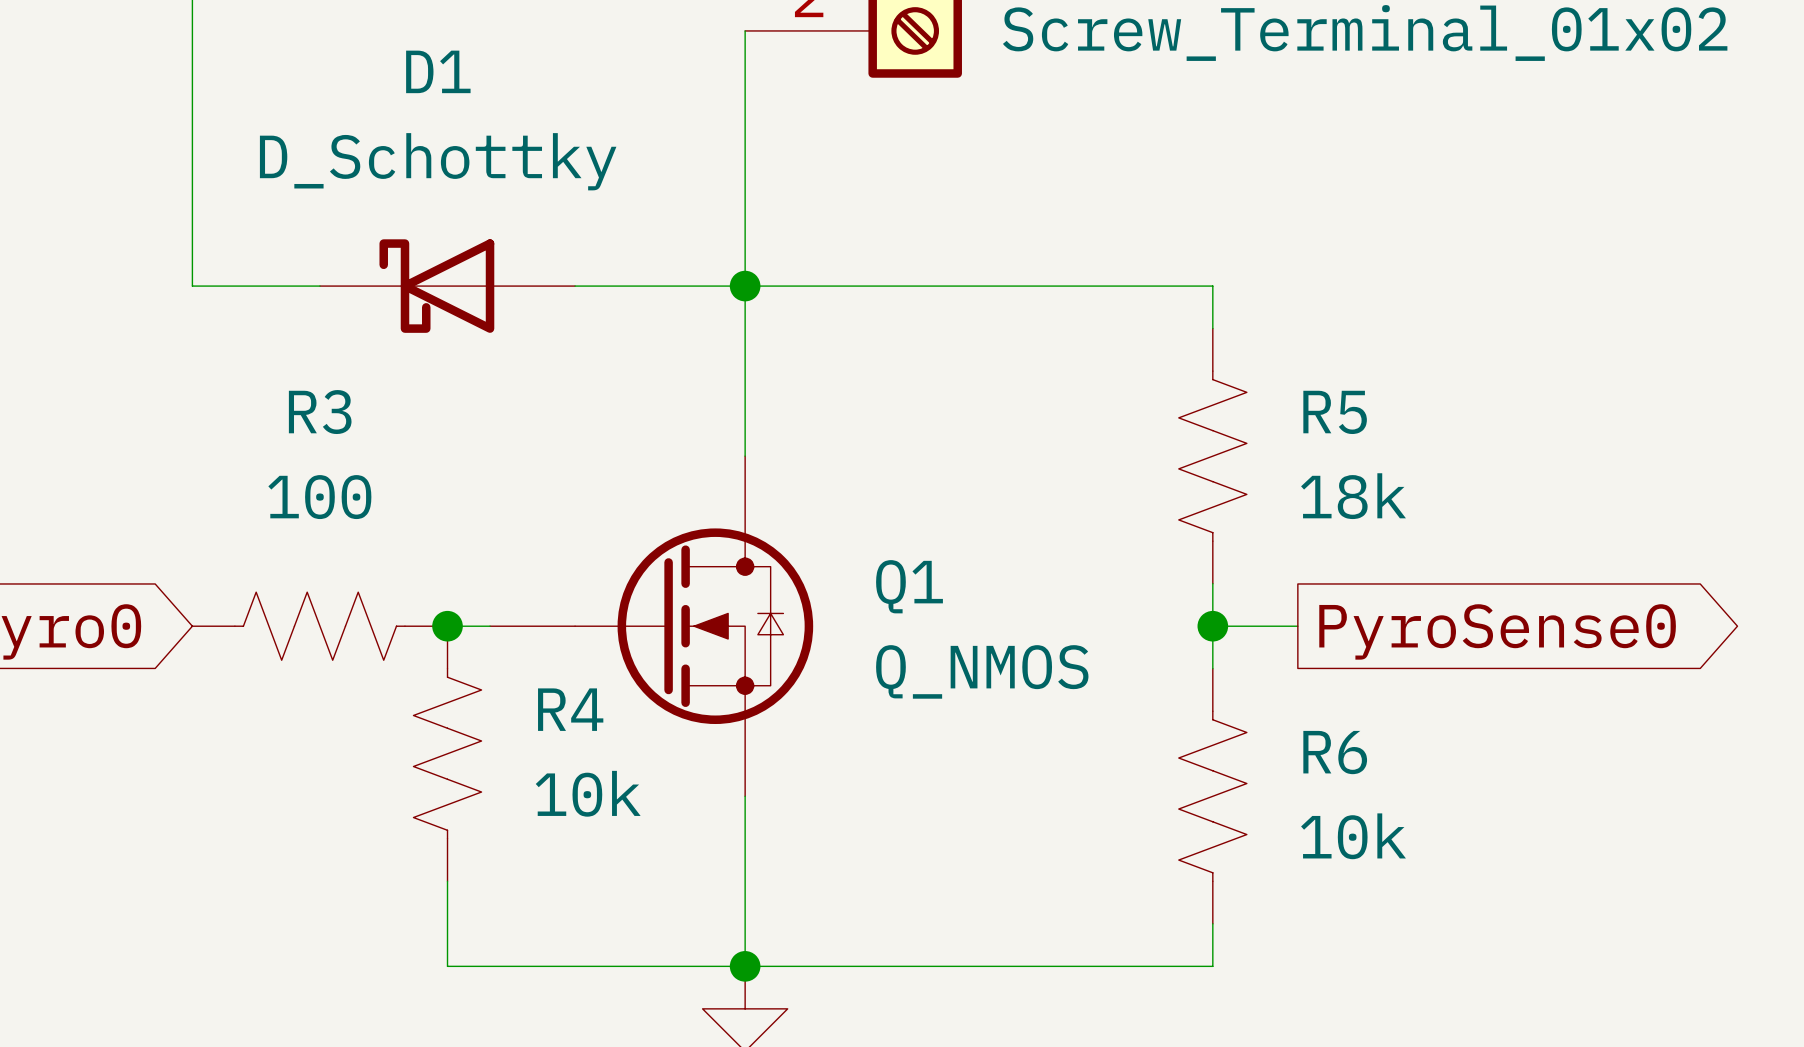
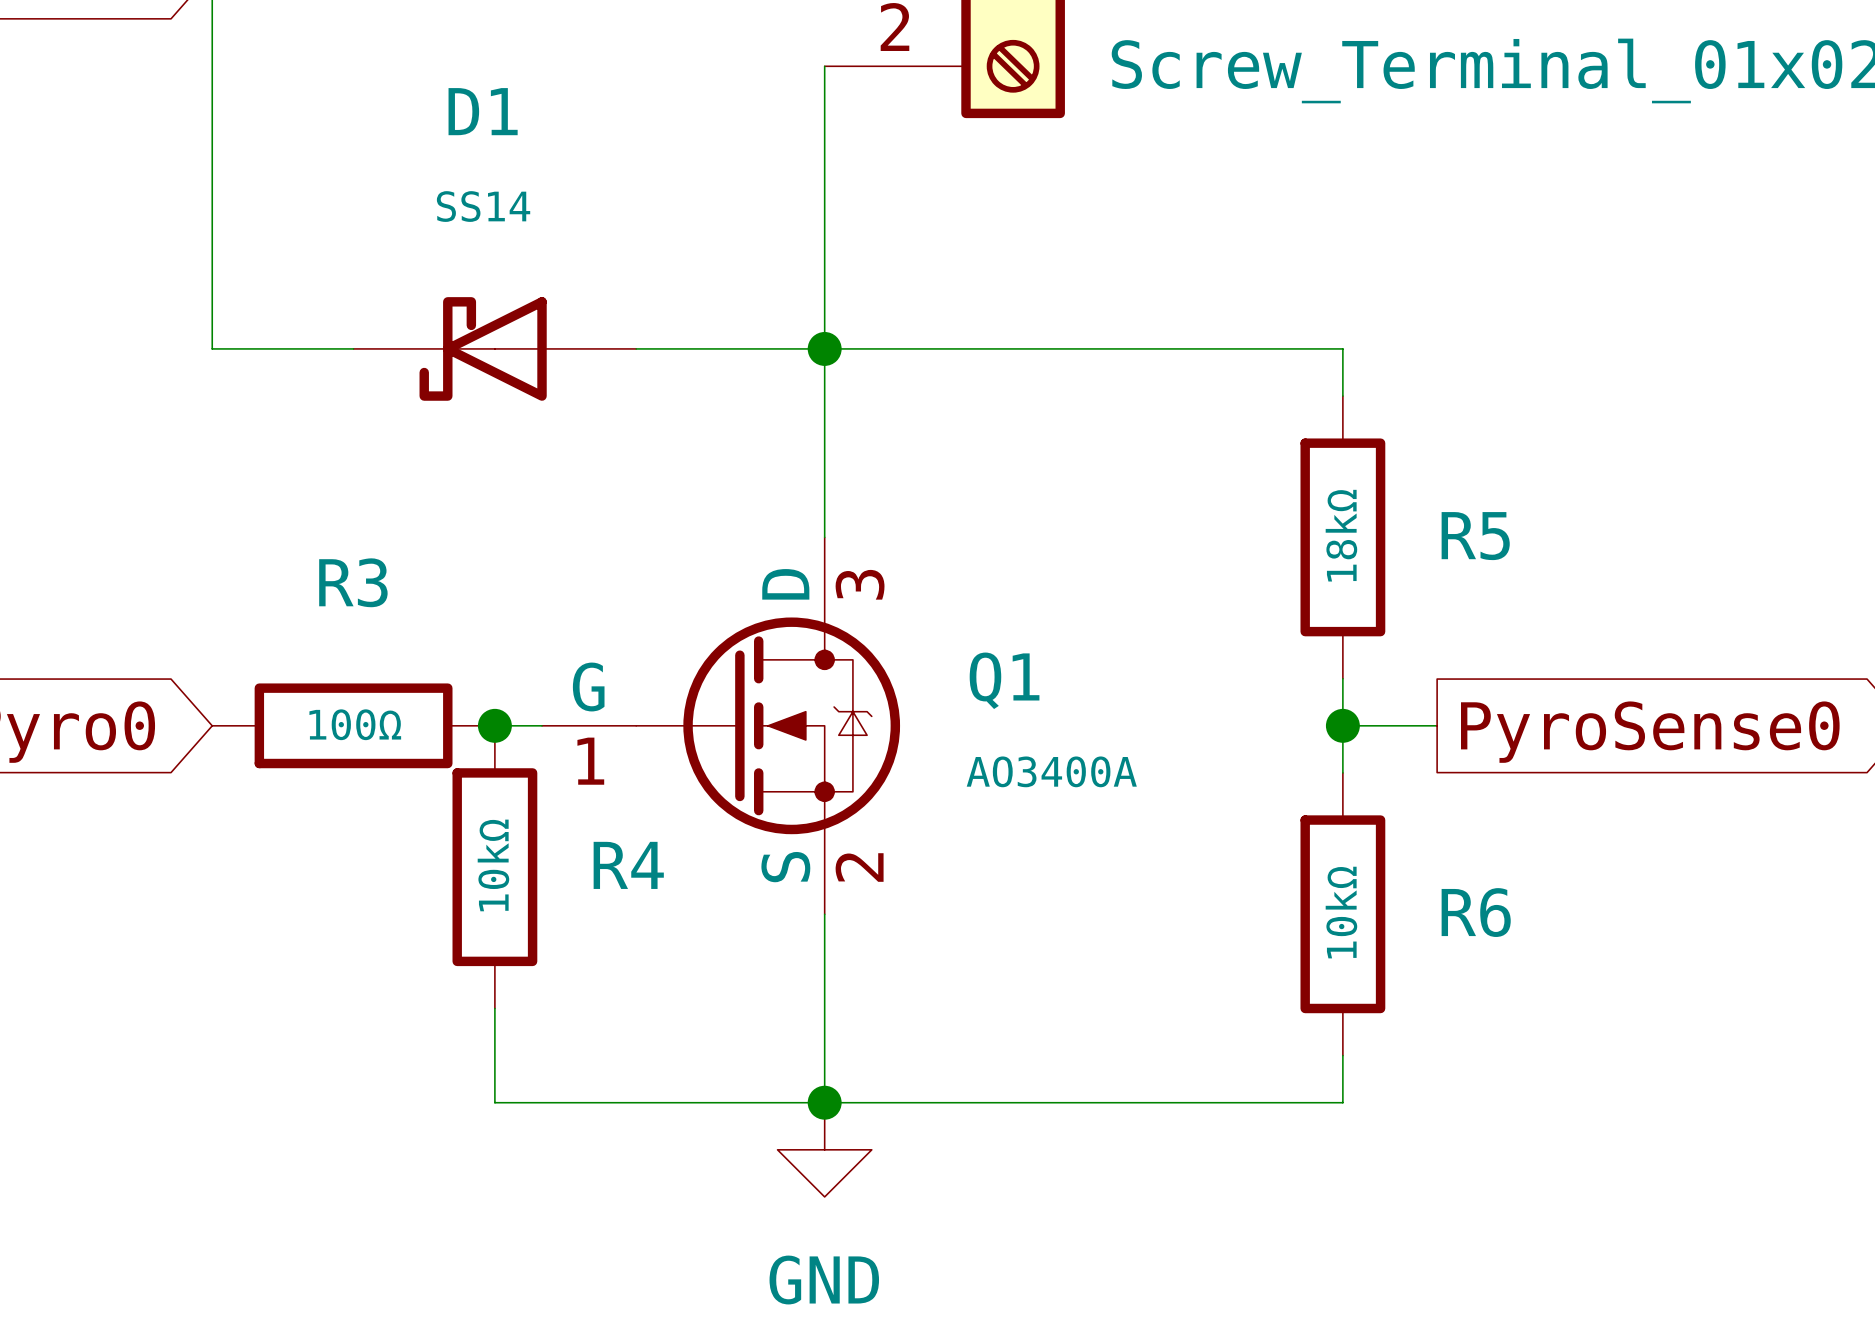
D1 value: D_Schottky (438, 161) -> SS14 (483, 206)
D1 symbol: [319, 239, 576, 333] -> [353, 297, 637, 401]
R5 symbol: [1178, 328, 1247, 584] -> [1300, 396, 1386, 679]
R3 name position: R3 (320, 412) -> R3 (353, 582)
Q1 symbol: [490, 456, 814, 797] -> [542, 537, 901, 915]
R5 value: 18k (1353, 496) -> 18kΩ (1341, 535)
R3 value: 100 (319, 497) -> 100Ω (355, 724)
R3 symbol: [192, 592, 448, 661] -> [212, 683, 495, 769]
R4 symbol: [413, 626, 482, 882] -> [452, 725, 538, 1009]
R6 symbol: [1178, 668, 1247, 924] -> [1300, 772, 1386, 1056]
Q1 value: Q_NMOS (982, 671) -> AO3400A (1051, 771)
R4 value: 10k (588, 793) -> 10kΩ (493, 865)
R6 value: 10k (1353, 836) -> 10kΩ (1341, 912)

